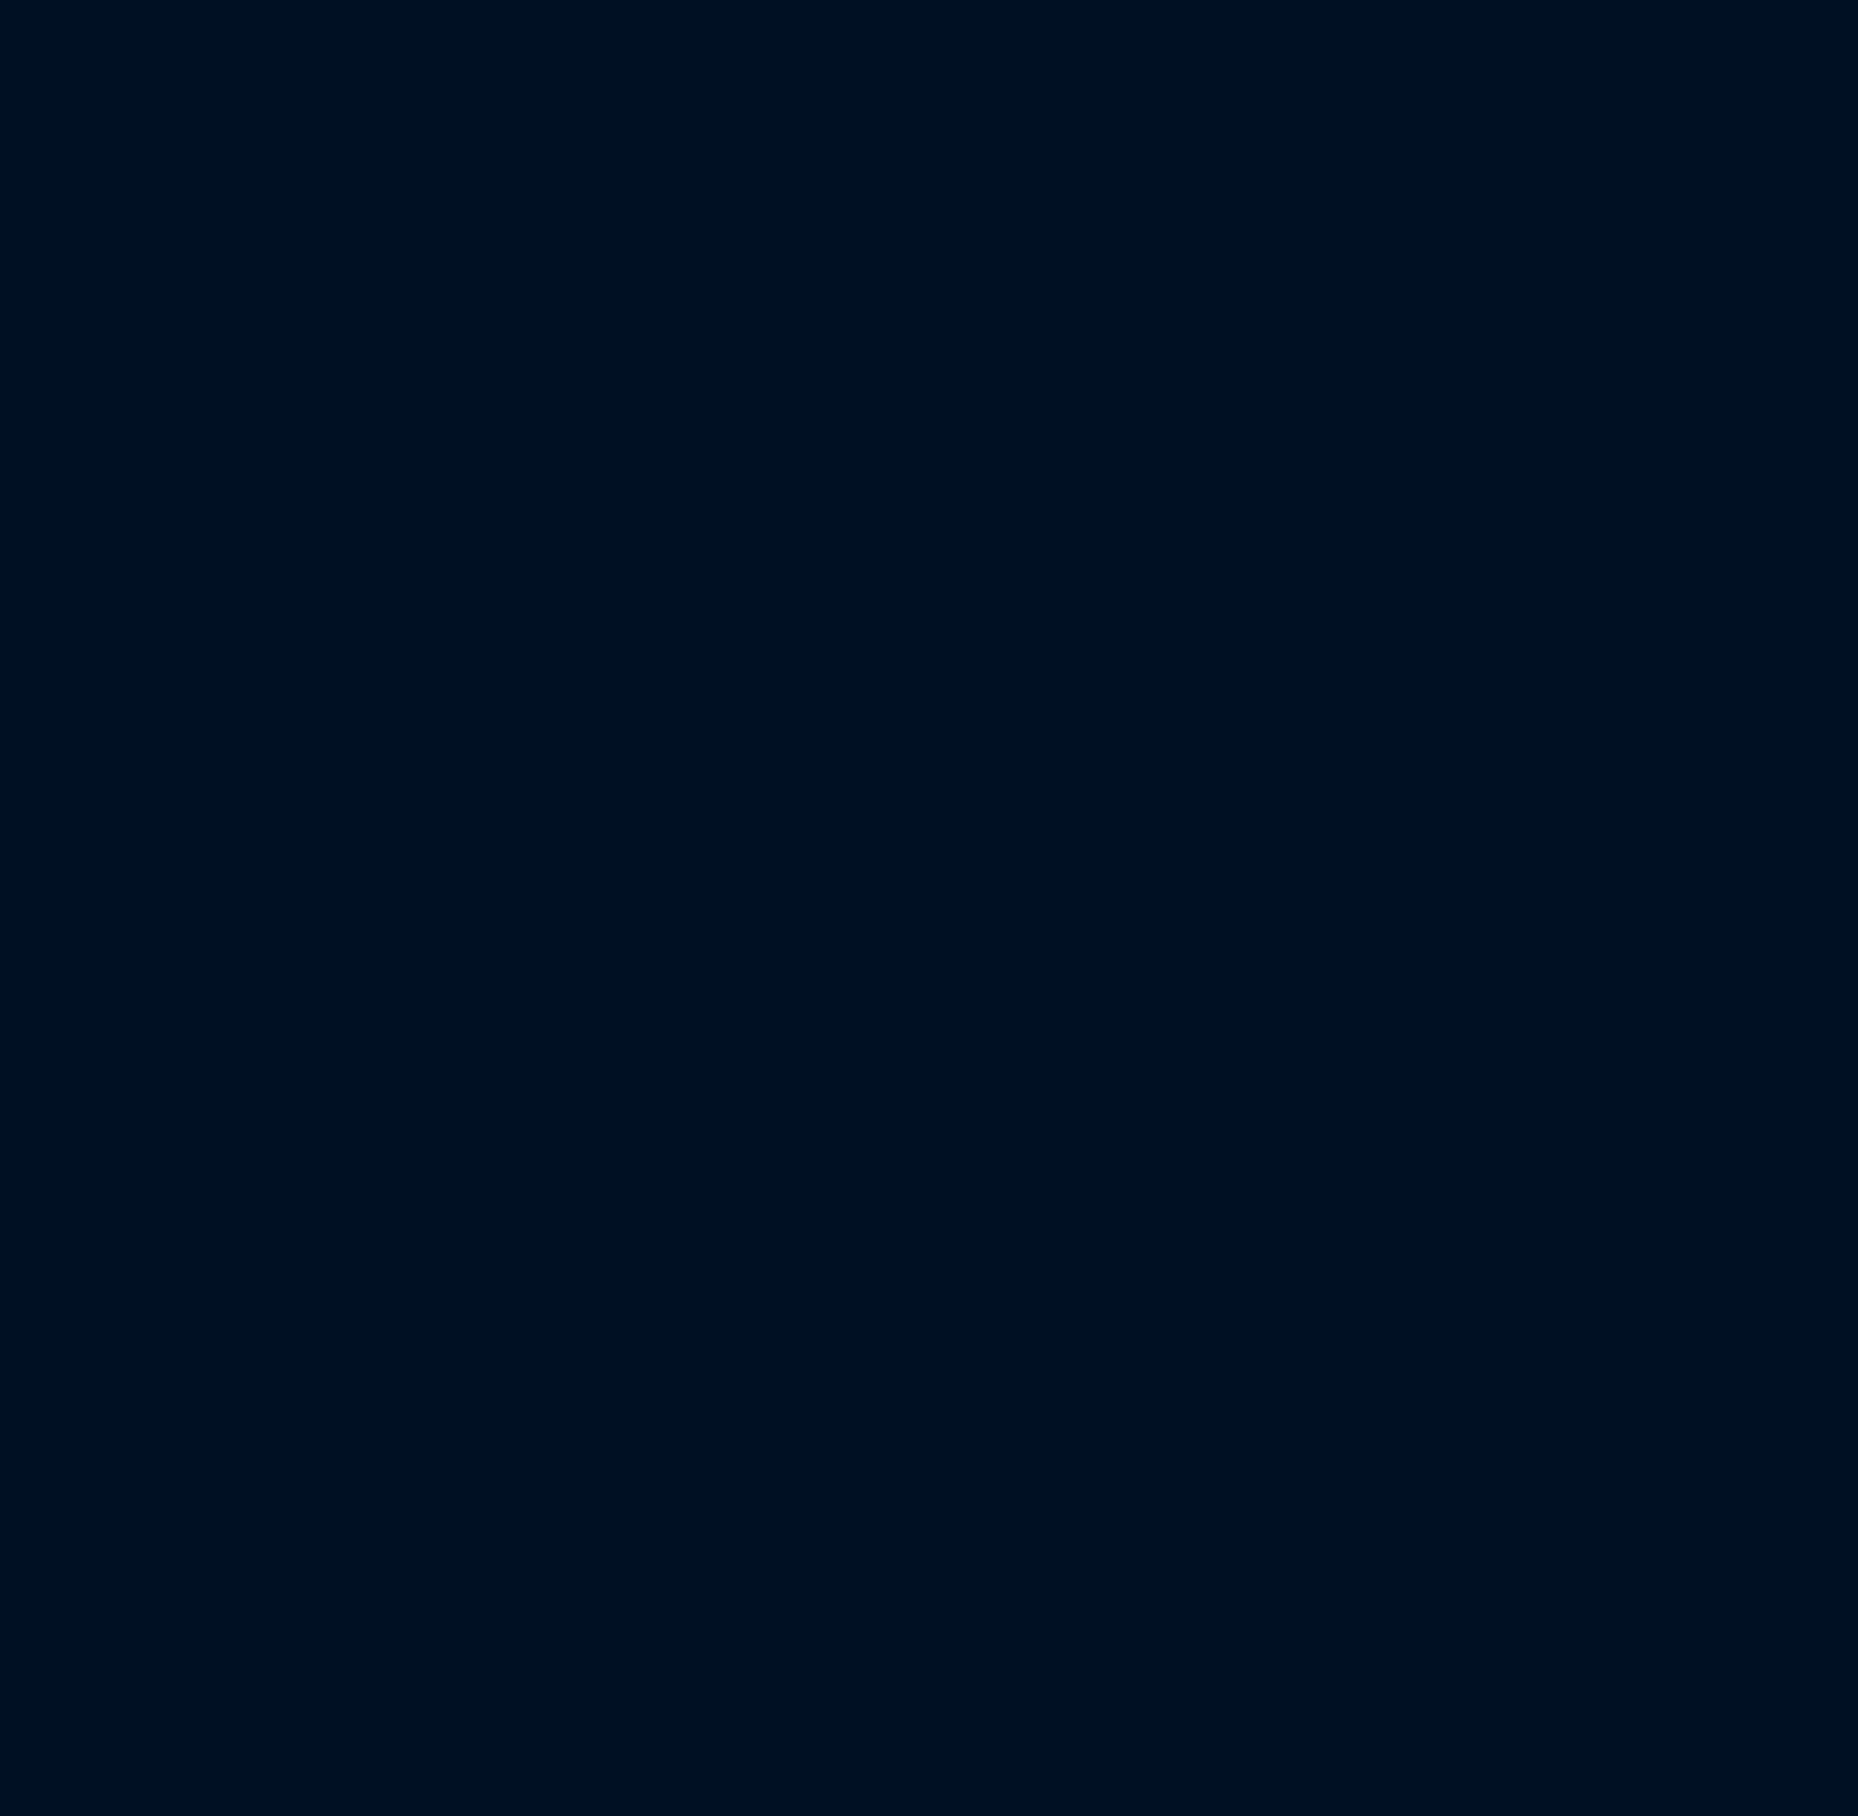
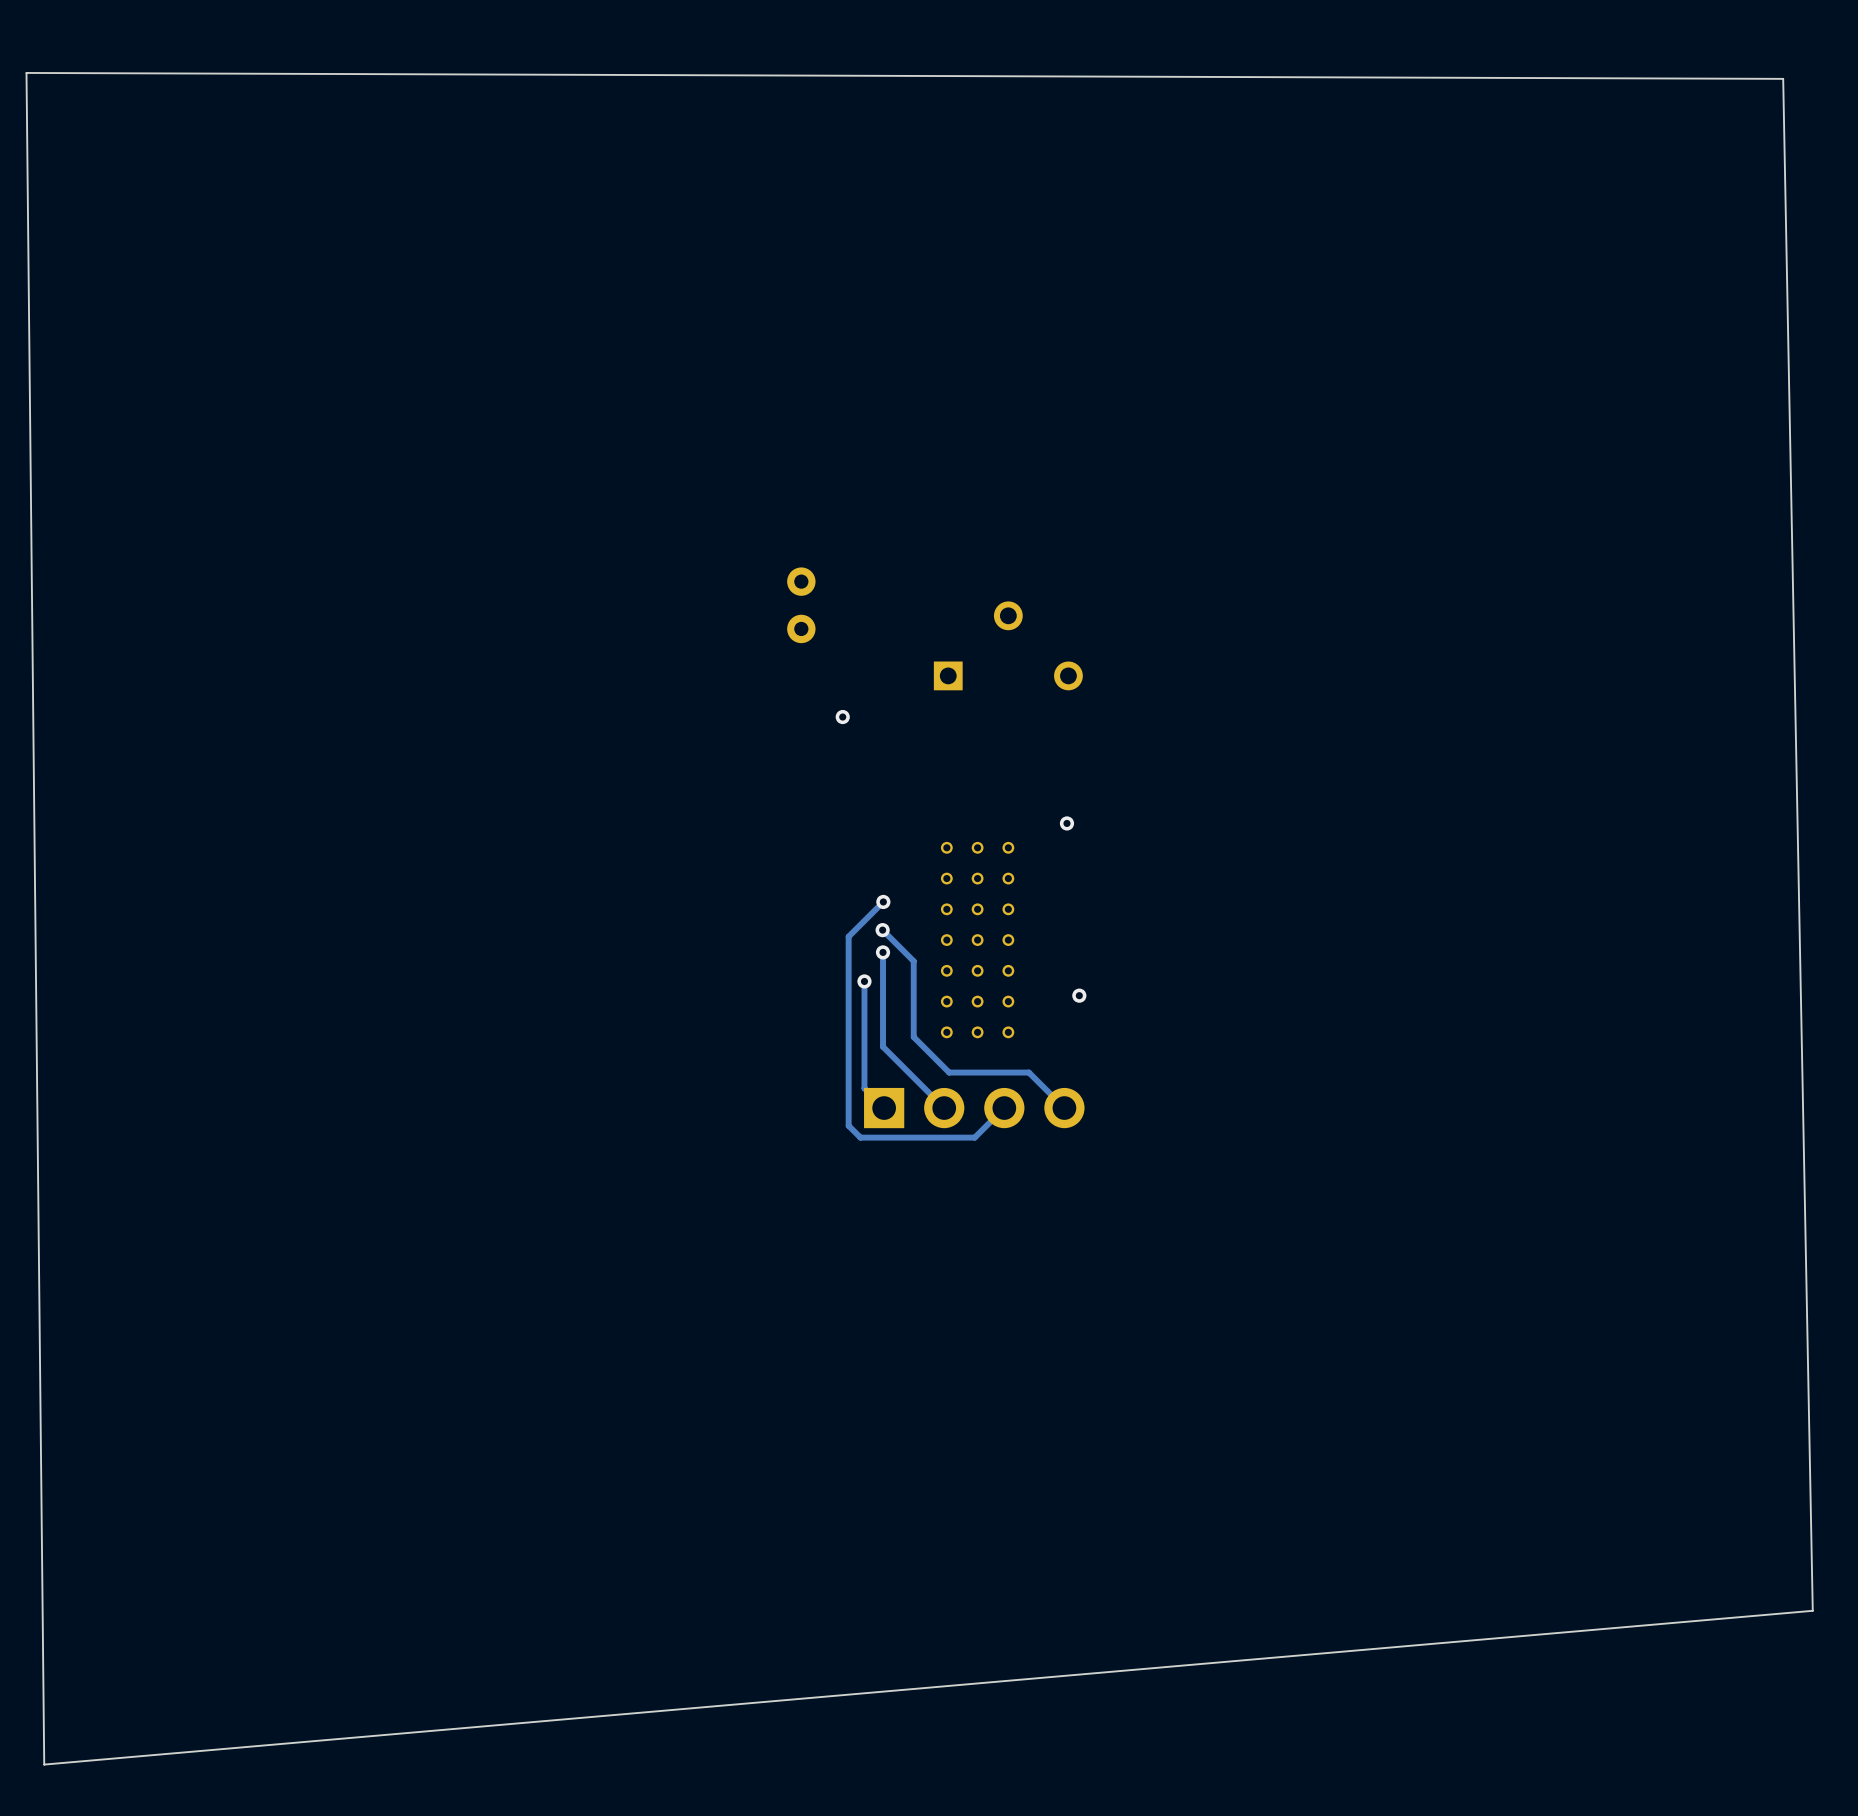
board edge: none -> (26, 72) (1783, 78) (1812, 1610) (44, 1764) (26, 72)
part: none -> (801, 605)
part: none -> (1008, 645)
via: none -> (842, 717)
via: none -> (1066, 823)
track: none -> (883, 901) (848, 936) (848, 1125) (860, 1137) (974, 1137) (1004, 1108)
via: none -> (883, 901)
track: none -> (882, 930) (913, 961) (913, 1037) (949, 1072) (1028, 1072) (1064, 1108)
via: none -> (882, 930)
part: none -> (977, 940)
track: none -> (883, 952) (883, 1046) (944, 1108)
via: none -> (883, 952)
track: none -> (864, 981) (864, 1088) (884, 1108)
via: none -> (864, 981)
via: none -> (1079, 995)
part: none -> (974, 1108)

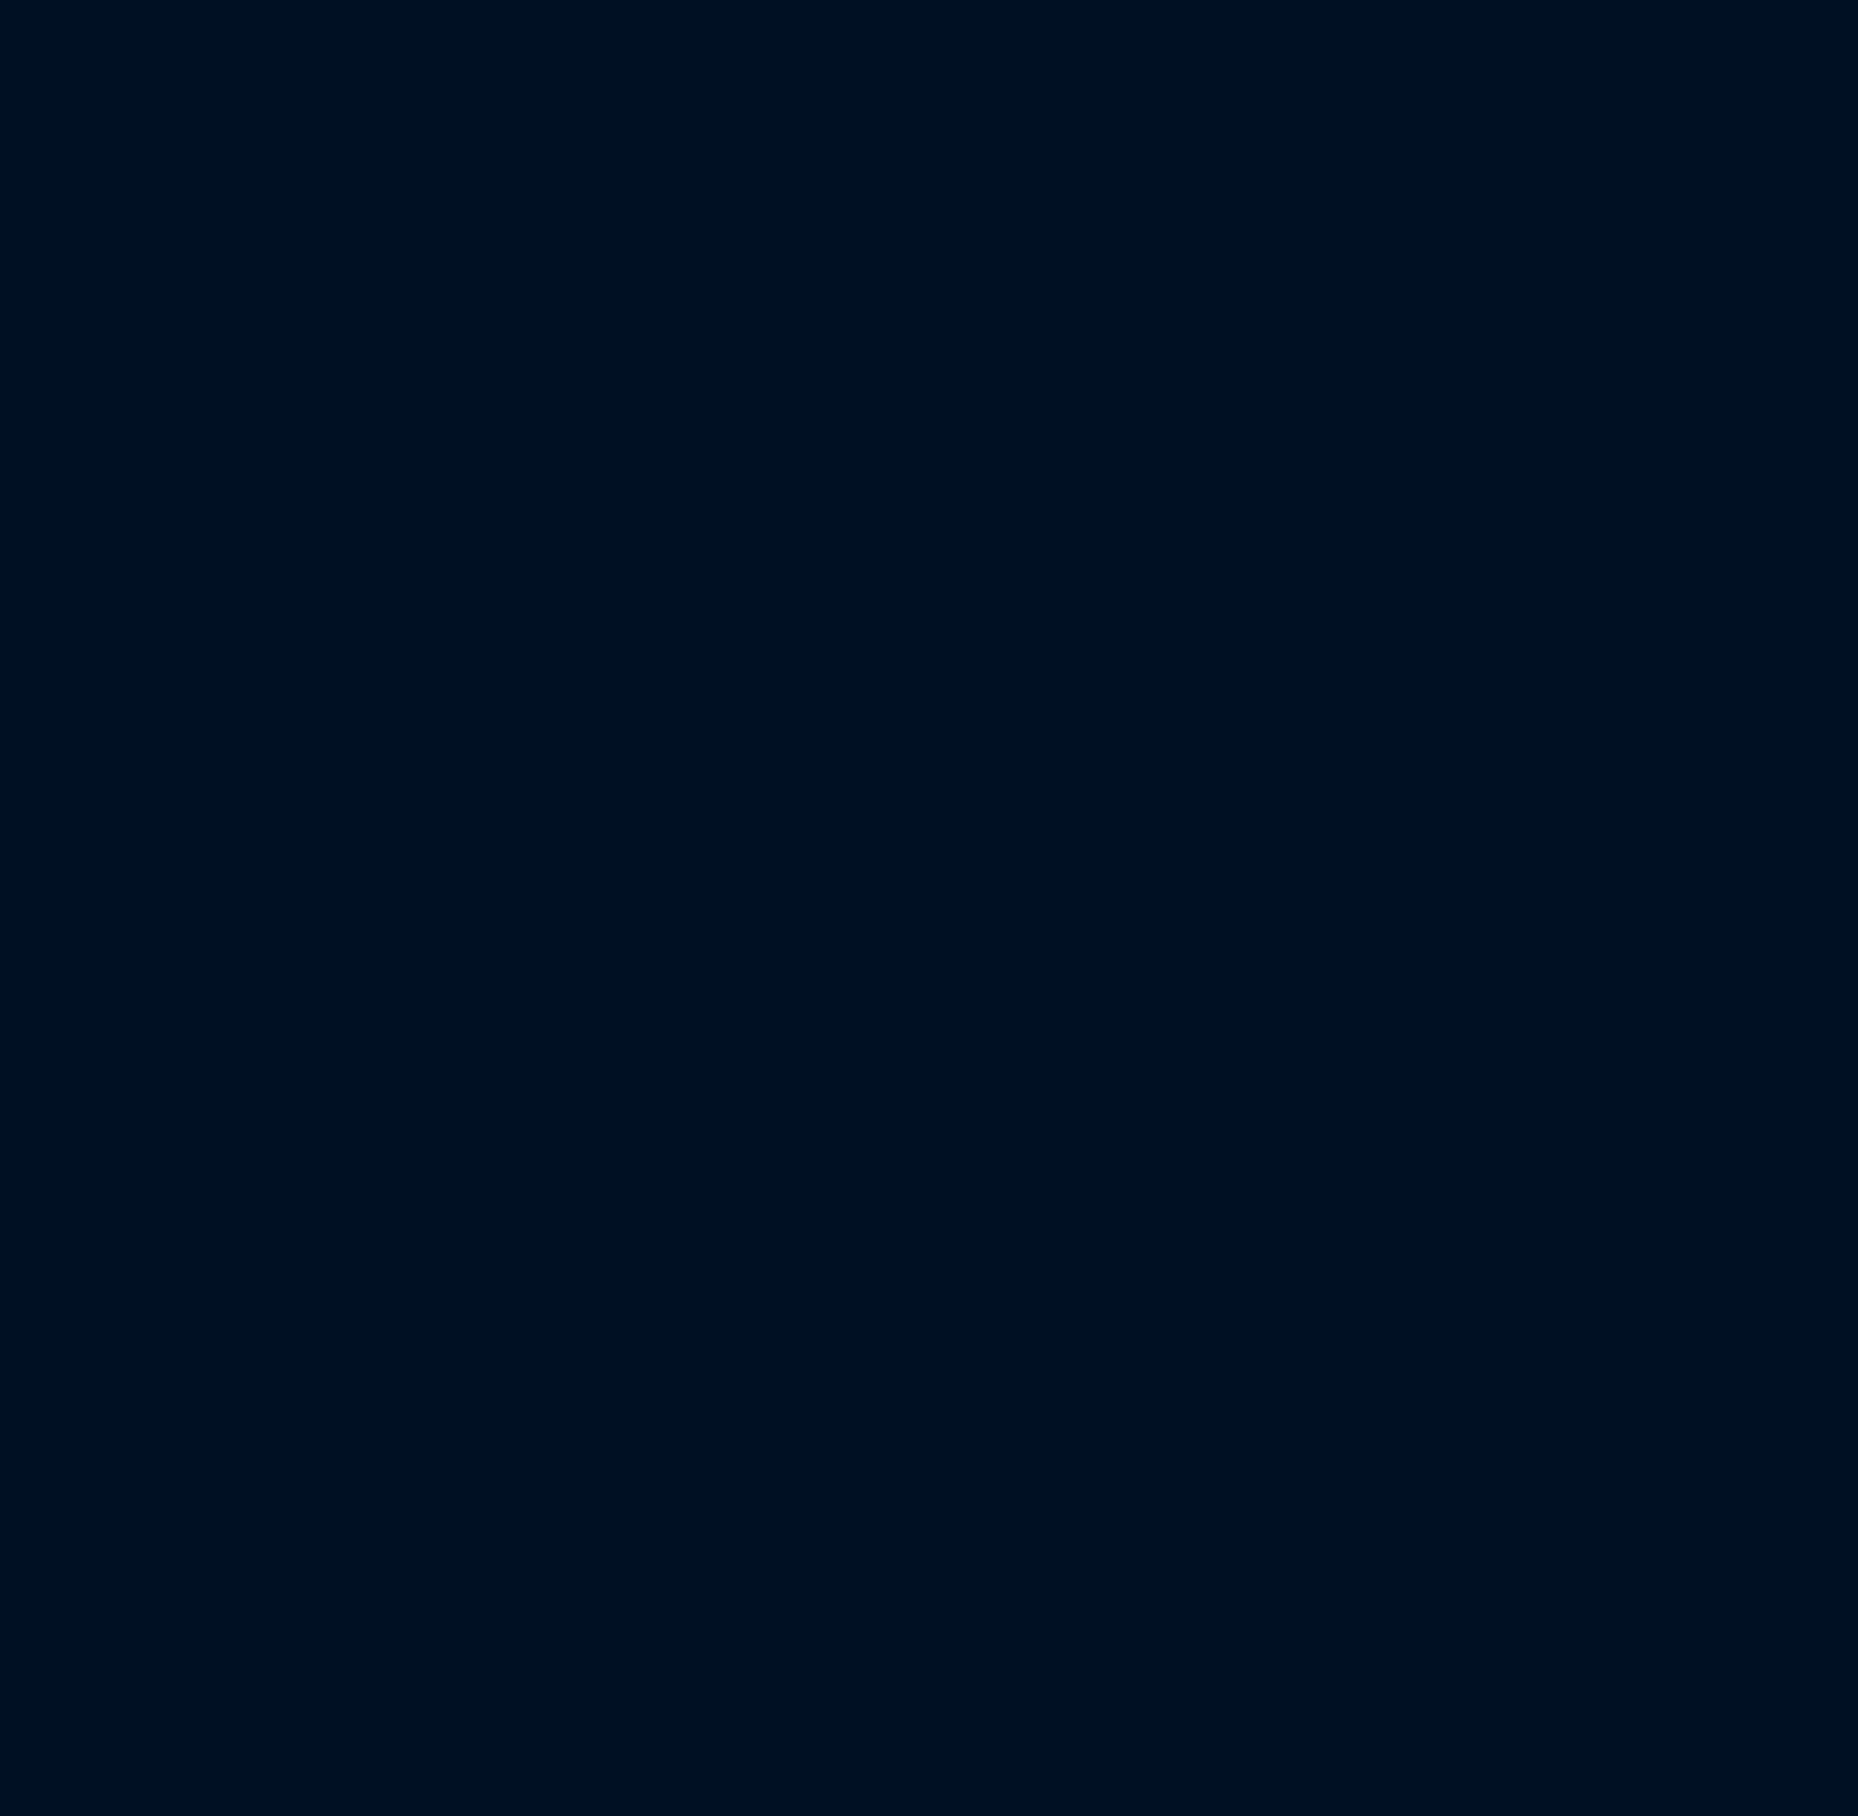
board edge: (26, 72) (1783, 78) (1812, 1610) (44, 1764) (26, 72) -> none
part: (801, 605) -> none
part: (1008, 645) -> none
via: (842, 717) -> none
via: (1066, 823) -> none
track: (883, 901) (848, 936) (848, 1125) (860, 1137) (974, 1137) (1004, 1108) -> none
via: (883, 901) -> none
track: (882, 930) (913, 961) (913, 1037) (949, 1072) (1028, 1072) (1064, 1108) -> none
via: (882, 930) -> none
part: (977, 940) -> none
track: (883, 952) (883, 1046) (944, 1108) -> none
via: (883, 952) -> none
track: (864, 981) (864, 1088) (884, 1108) -> none
via: (864, 981) -> none
via: (1079, 995) -> none
part: (974, 1108) -> none

